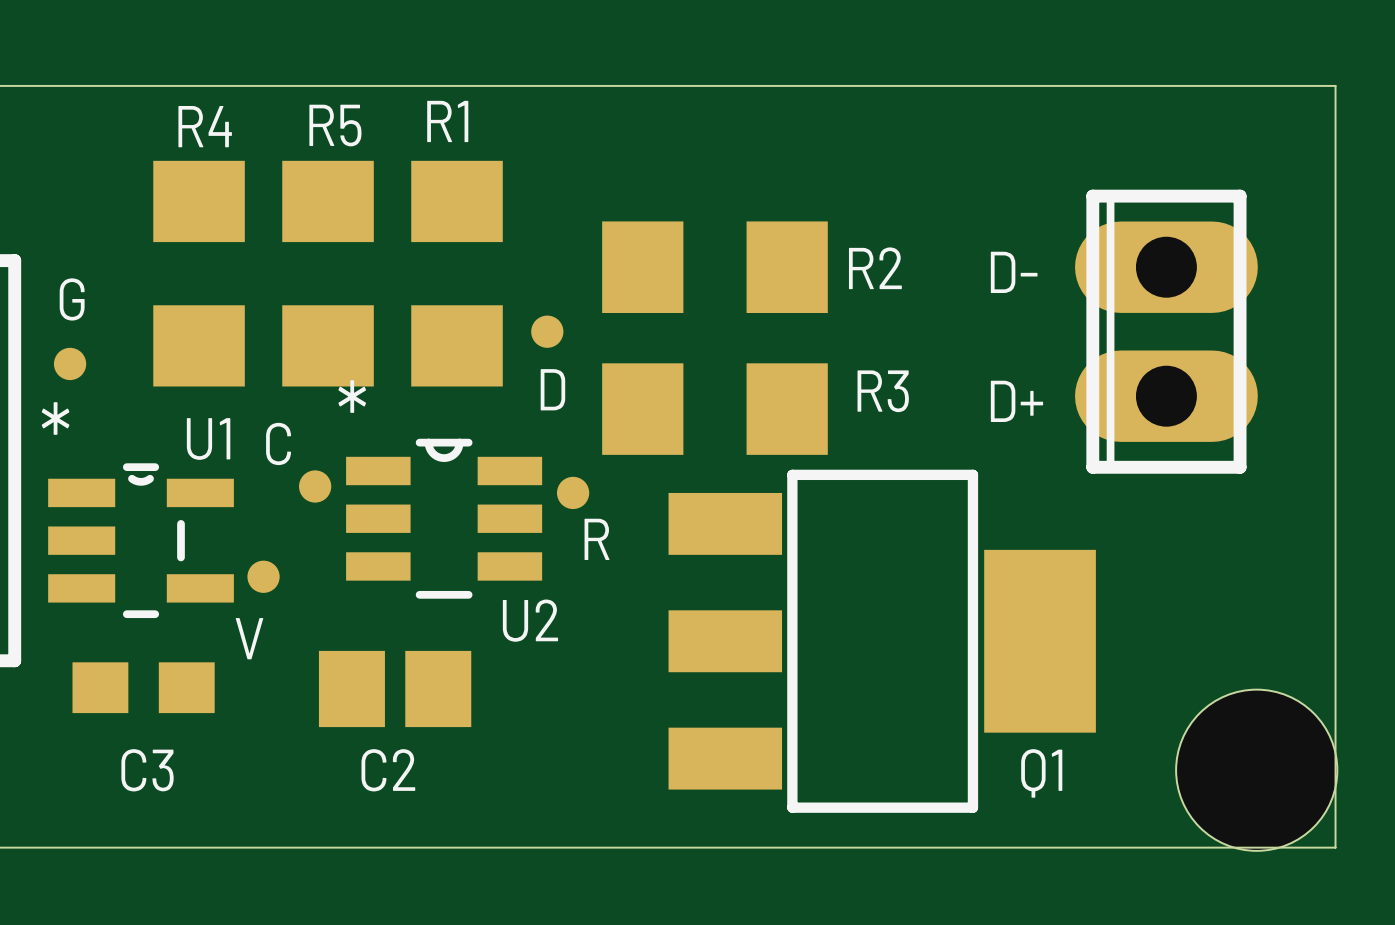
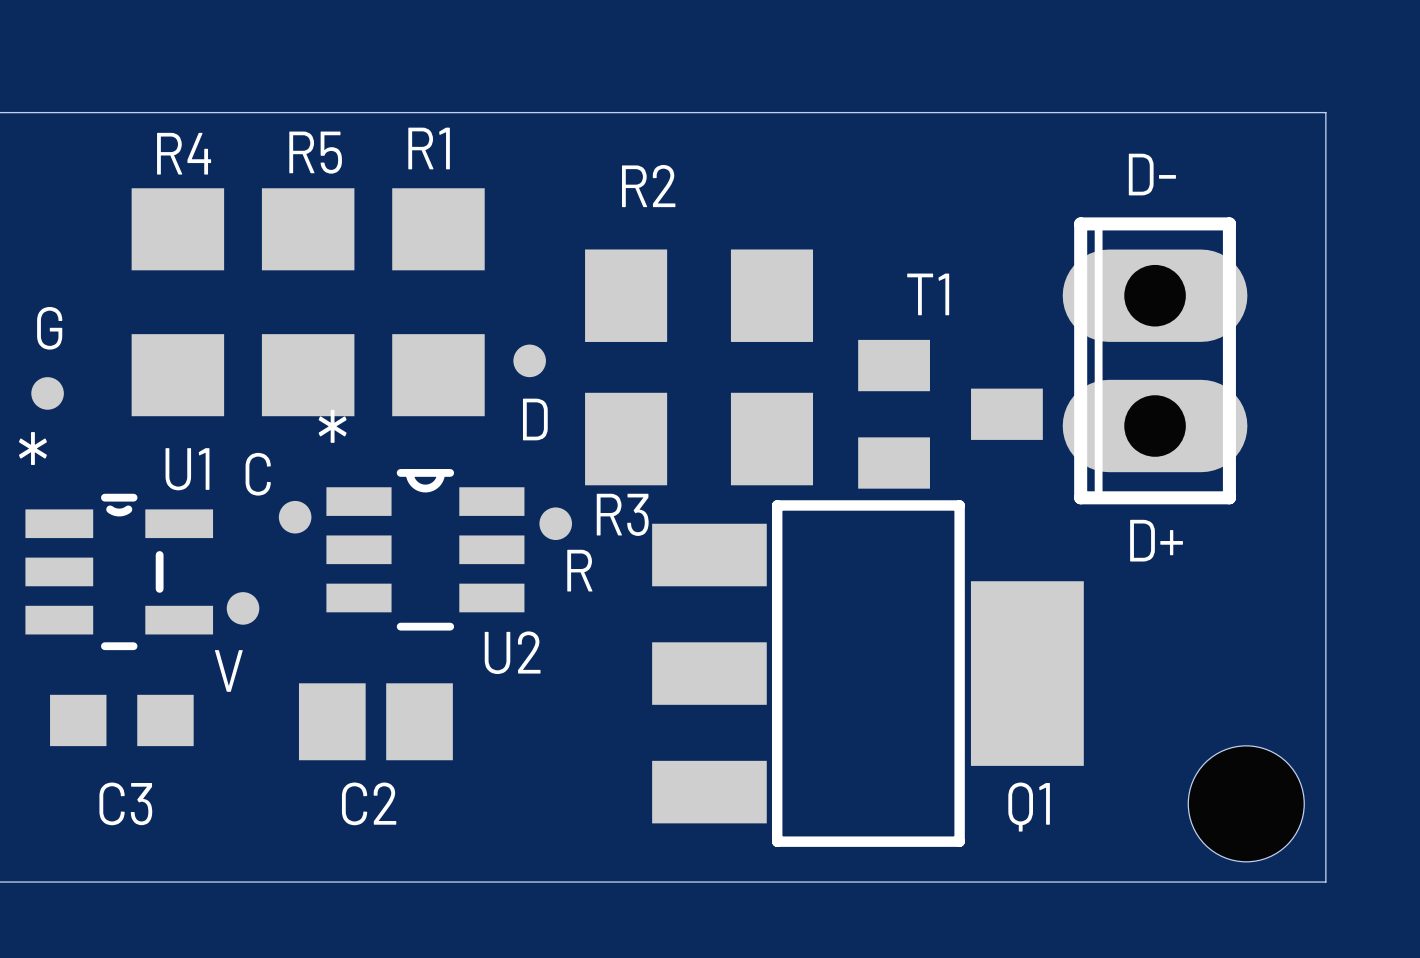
R2 name position: R2 (875, 268) -> R2 (648, 186)
text position: D- (1014, 272) -> D- (1152, 174)
T1: none -> (950, 414)
R3 name position: R3 (883, 391) -> R3 (622, 514)
text position: D+ (1016, 401) -> D+ (1156, 540)
hole size: [1176, 689, 1338, 851] -> [1188, 745, 1305, 862]

